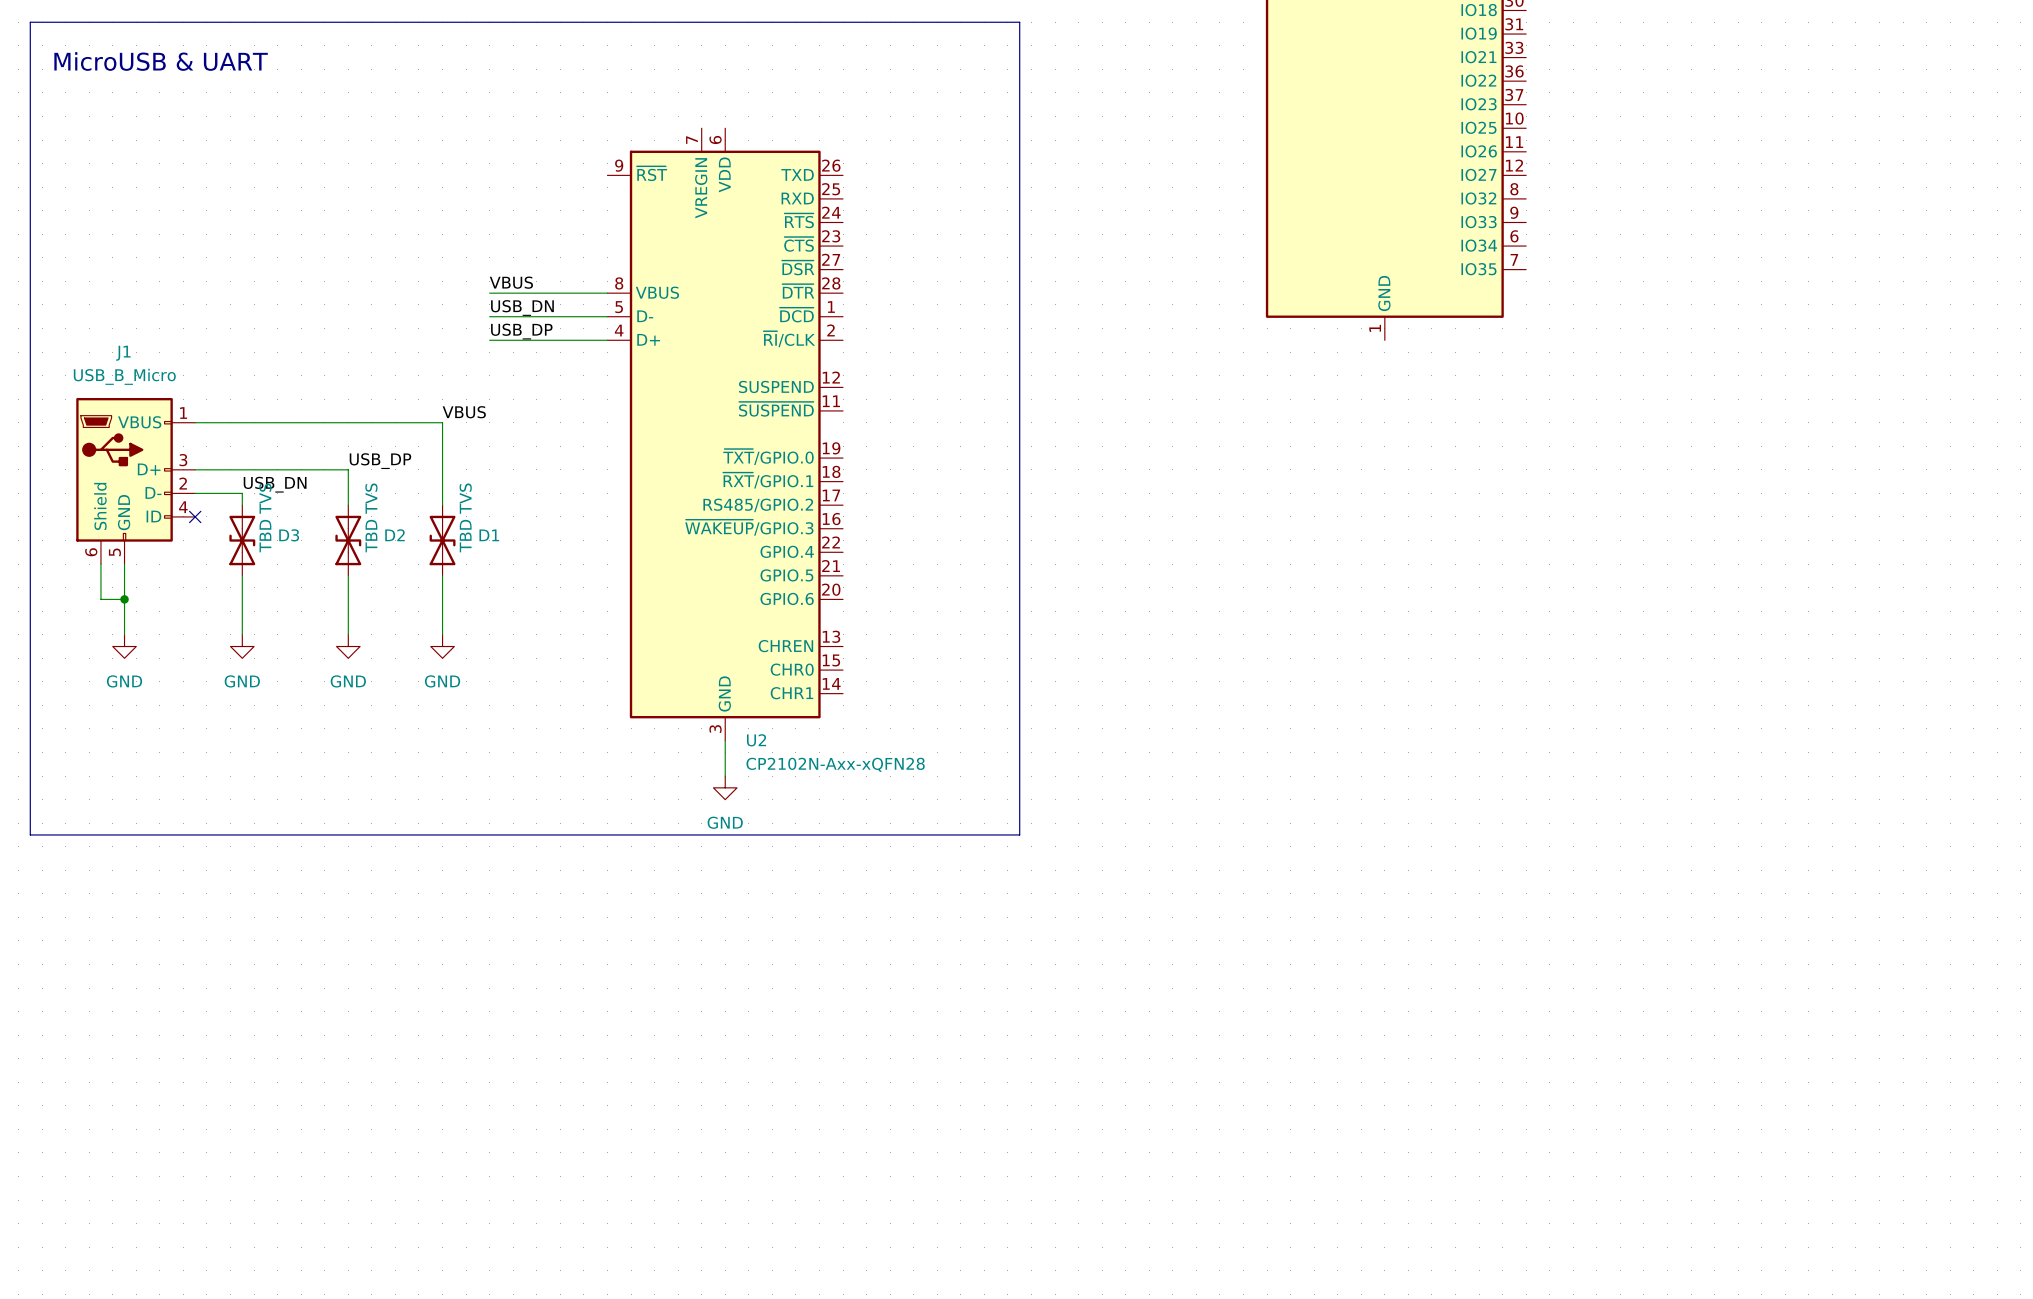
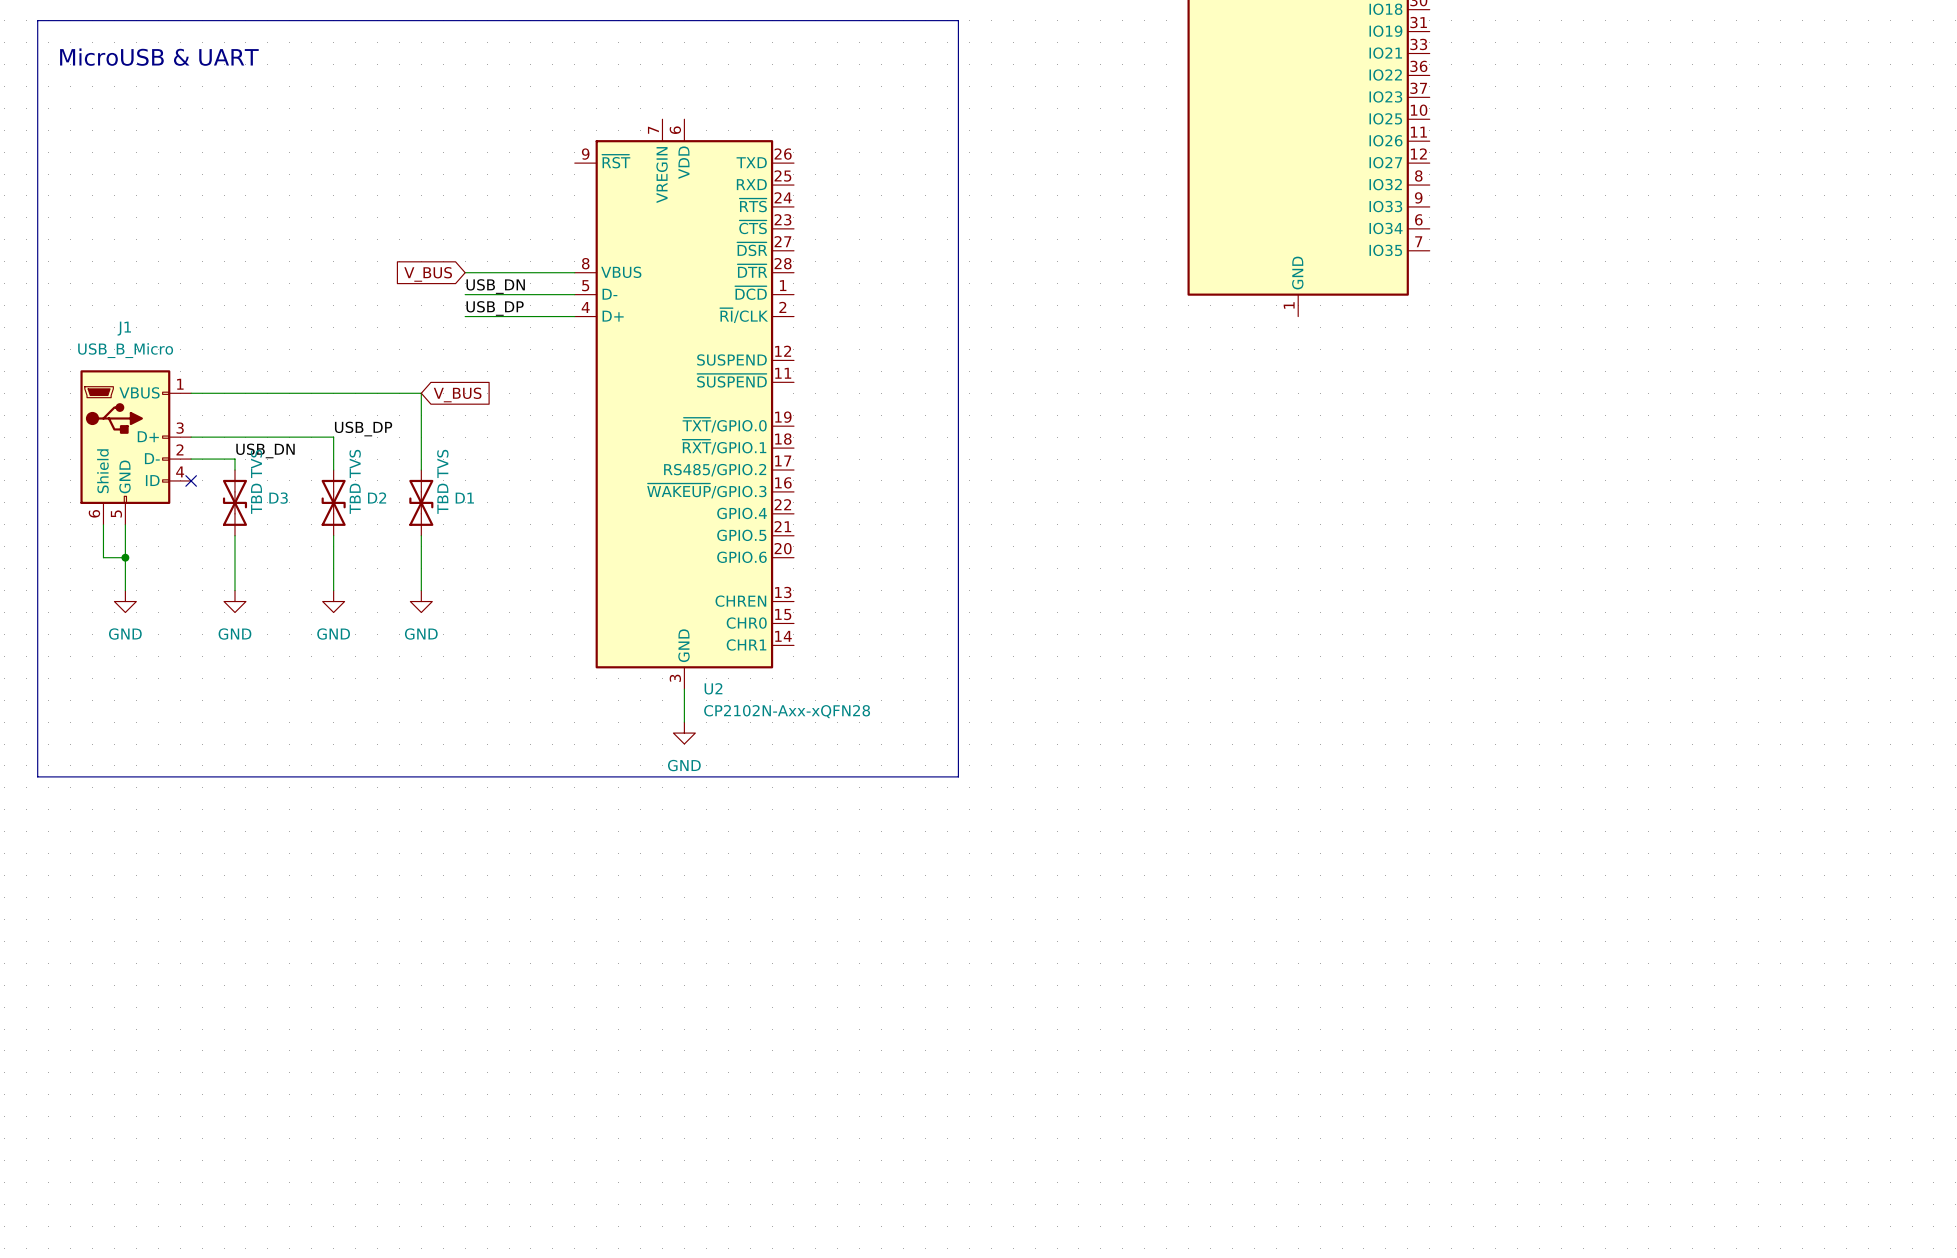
label: VBUS (511, 282) -> none
global label: none -> V_BUS (428, 274)
label: VBUS (464, 412) -> none
global label: none -> V_BUS (457, 394)

